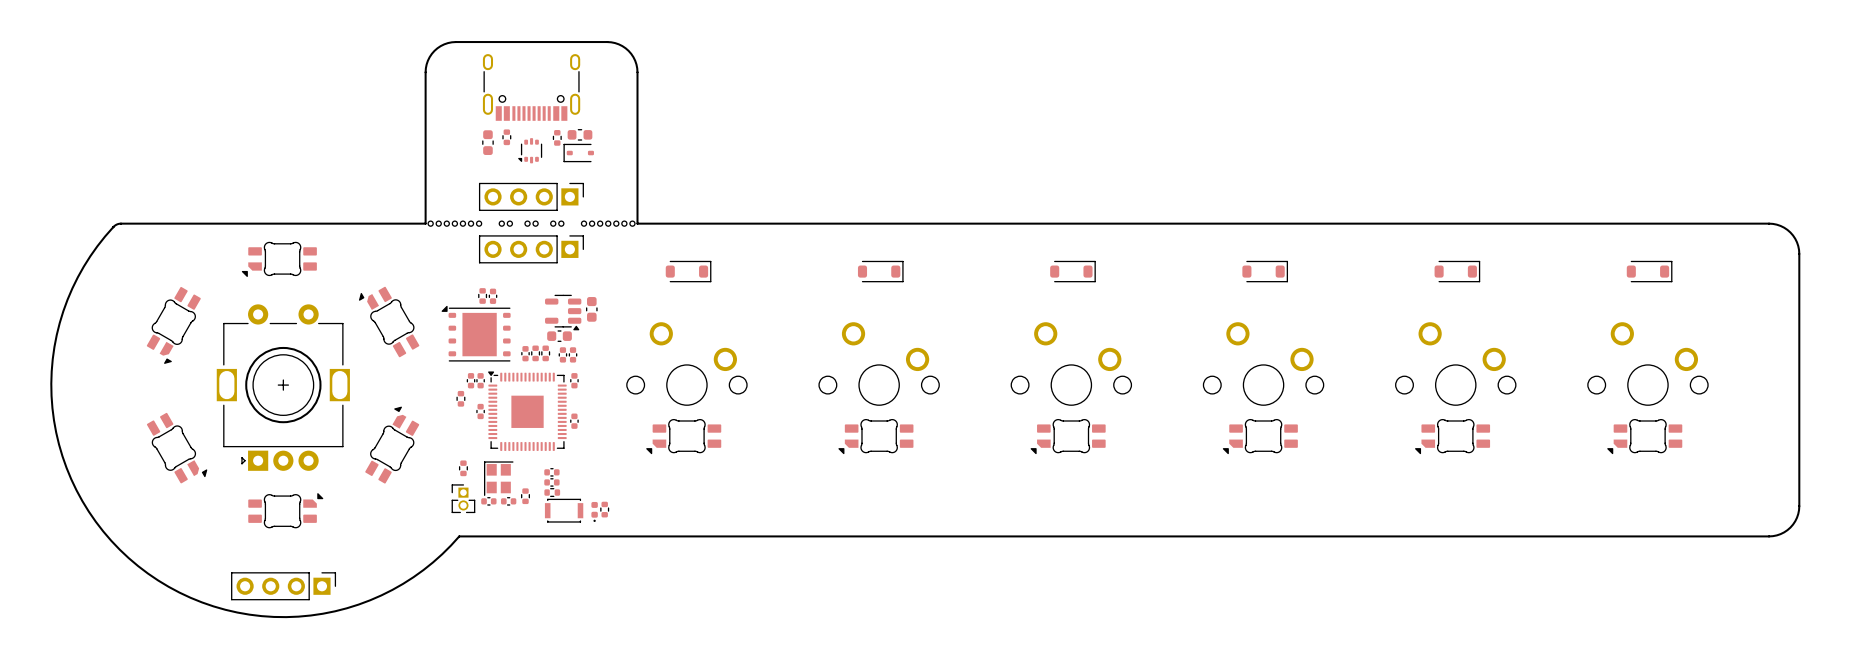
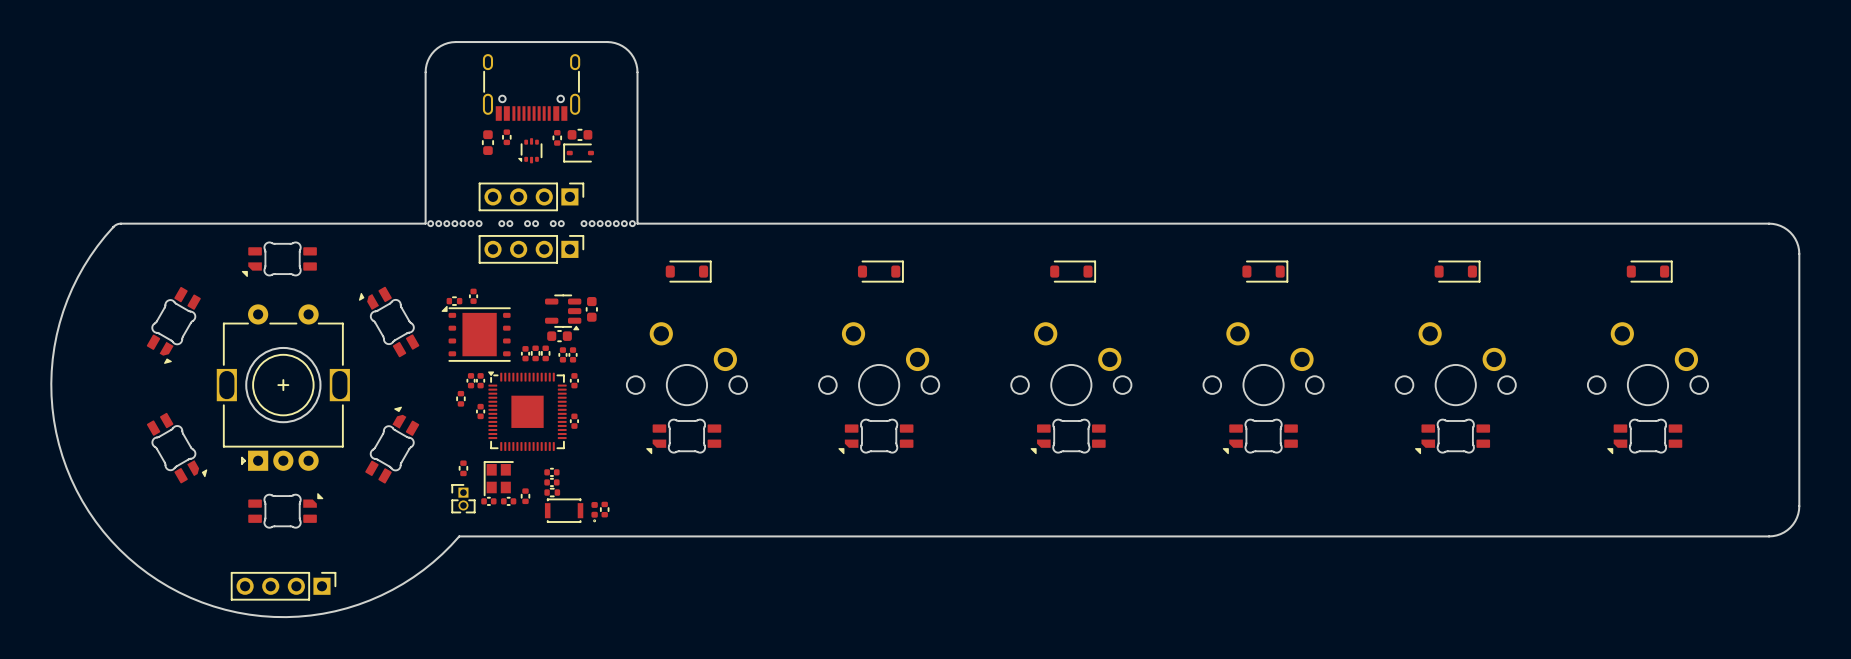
part footprint: [478, 288, 488, 304] -> [469, 288, 478, 304]
part: (493, 296) -> none
part: none -> (454, 301)

